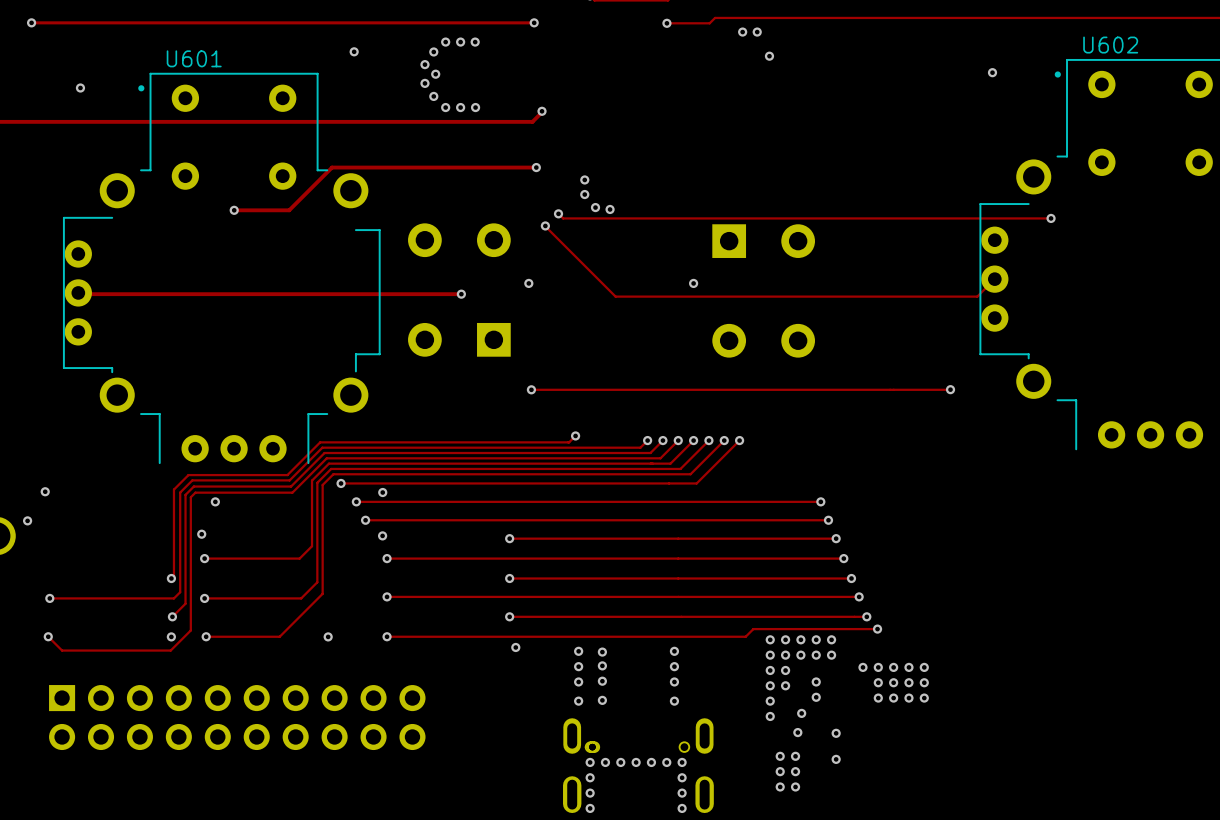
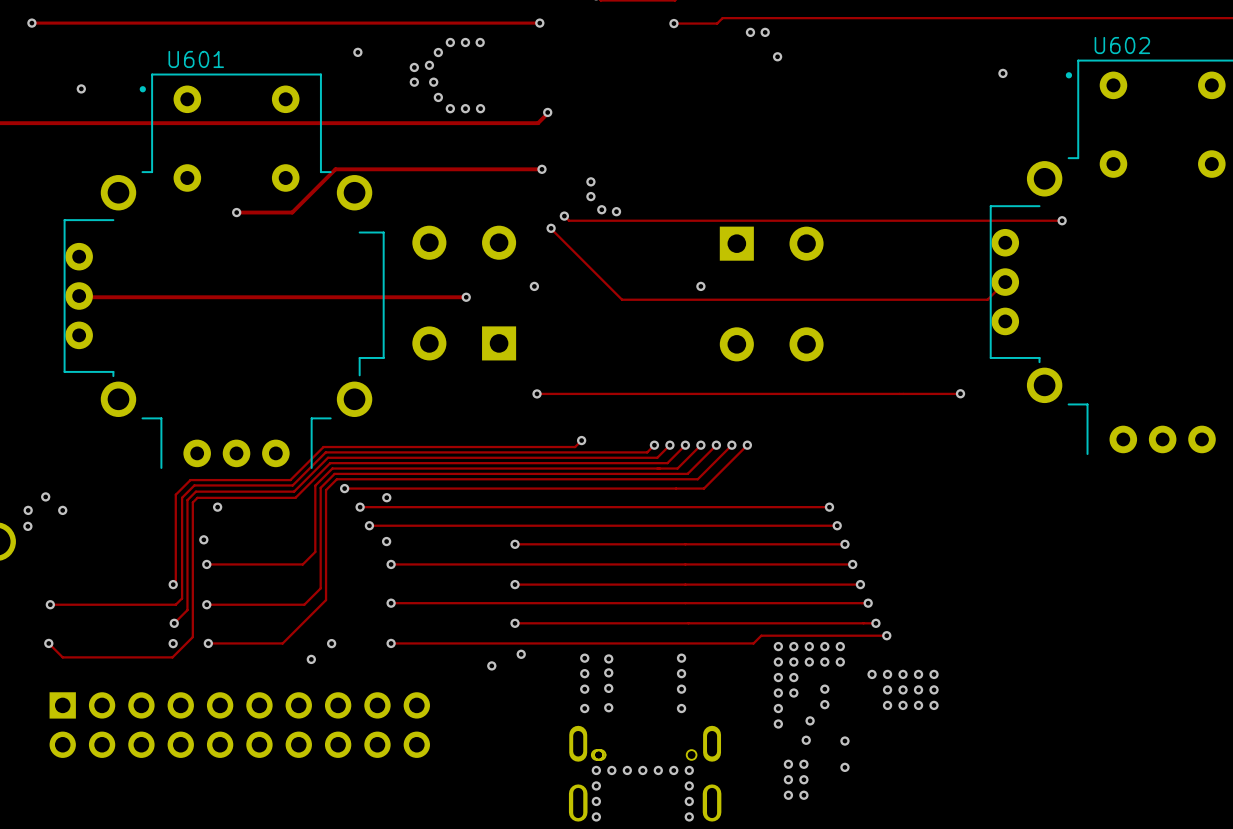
via: none -> (414, 67)
via: (435, 74) -> none
via: none -> (414, 82)
via: none -> (433, 82)
via: (424, 83) -> none
via: none -> (28, 510)
via: none -> (62, 510)
via: none -> (311, 659)
via: none -> (491, 665)

